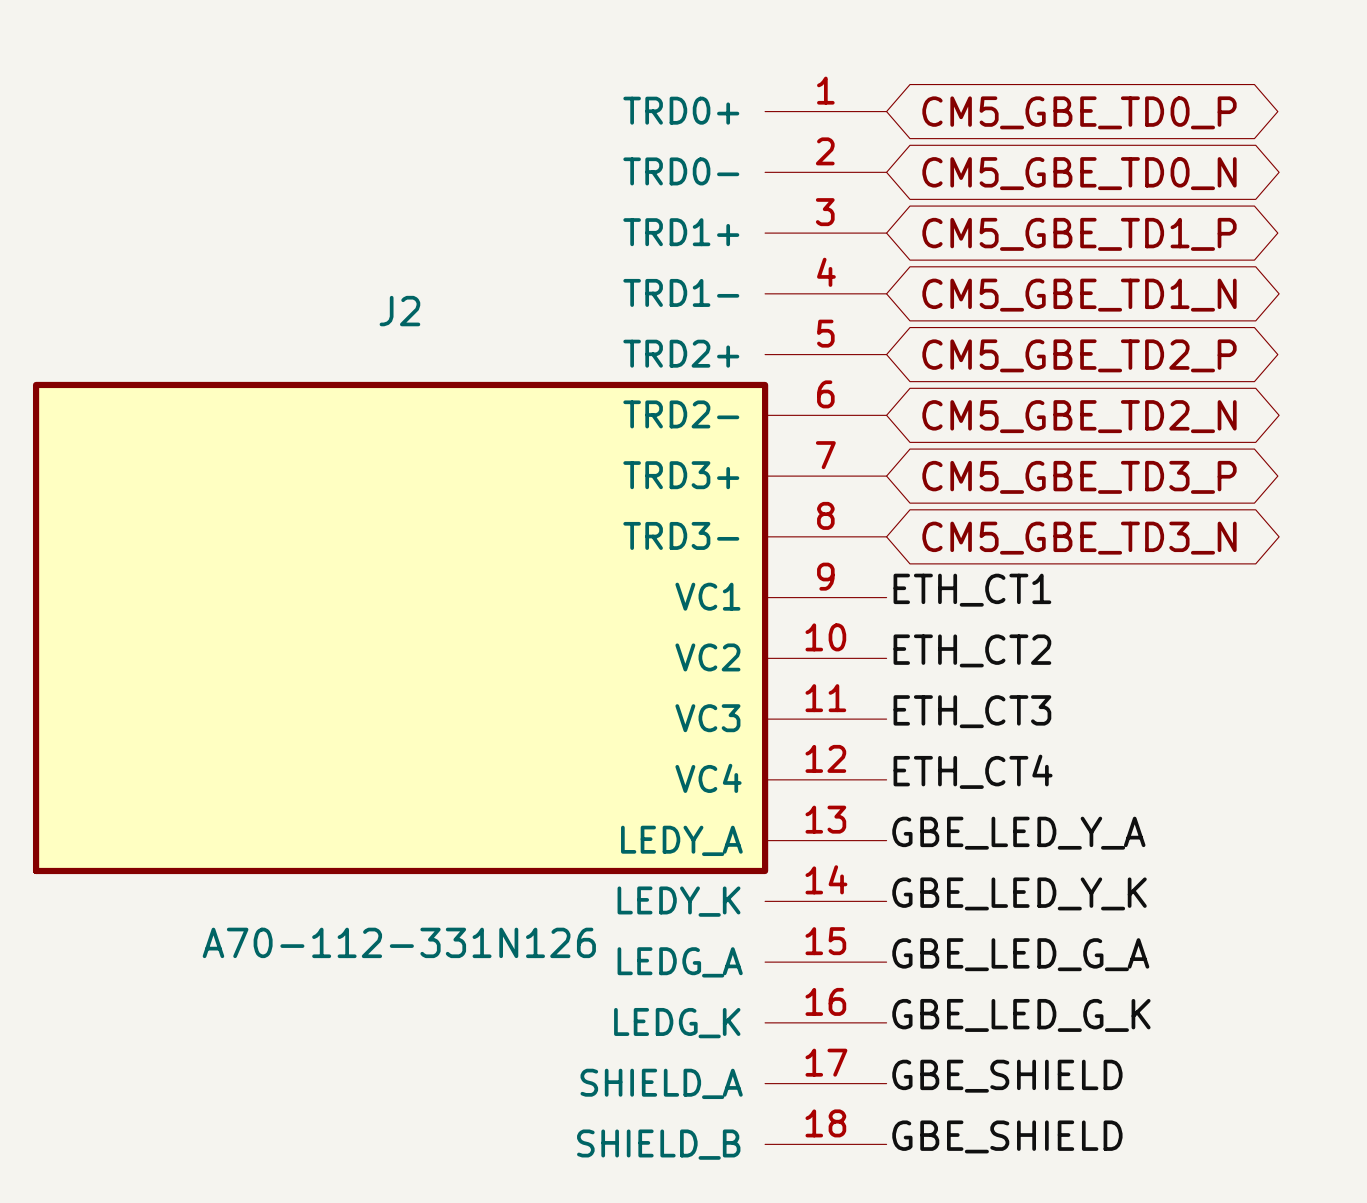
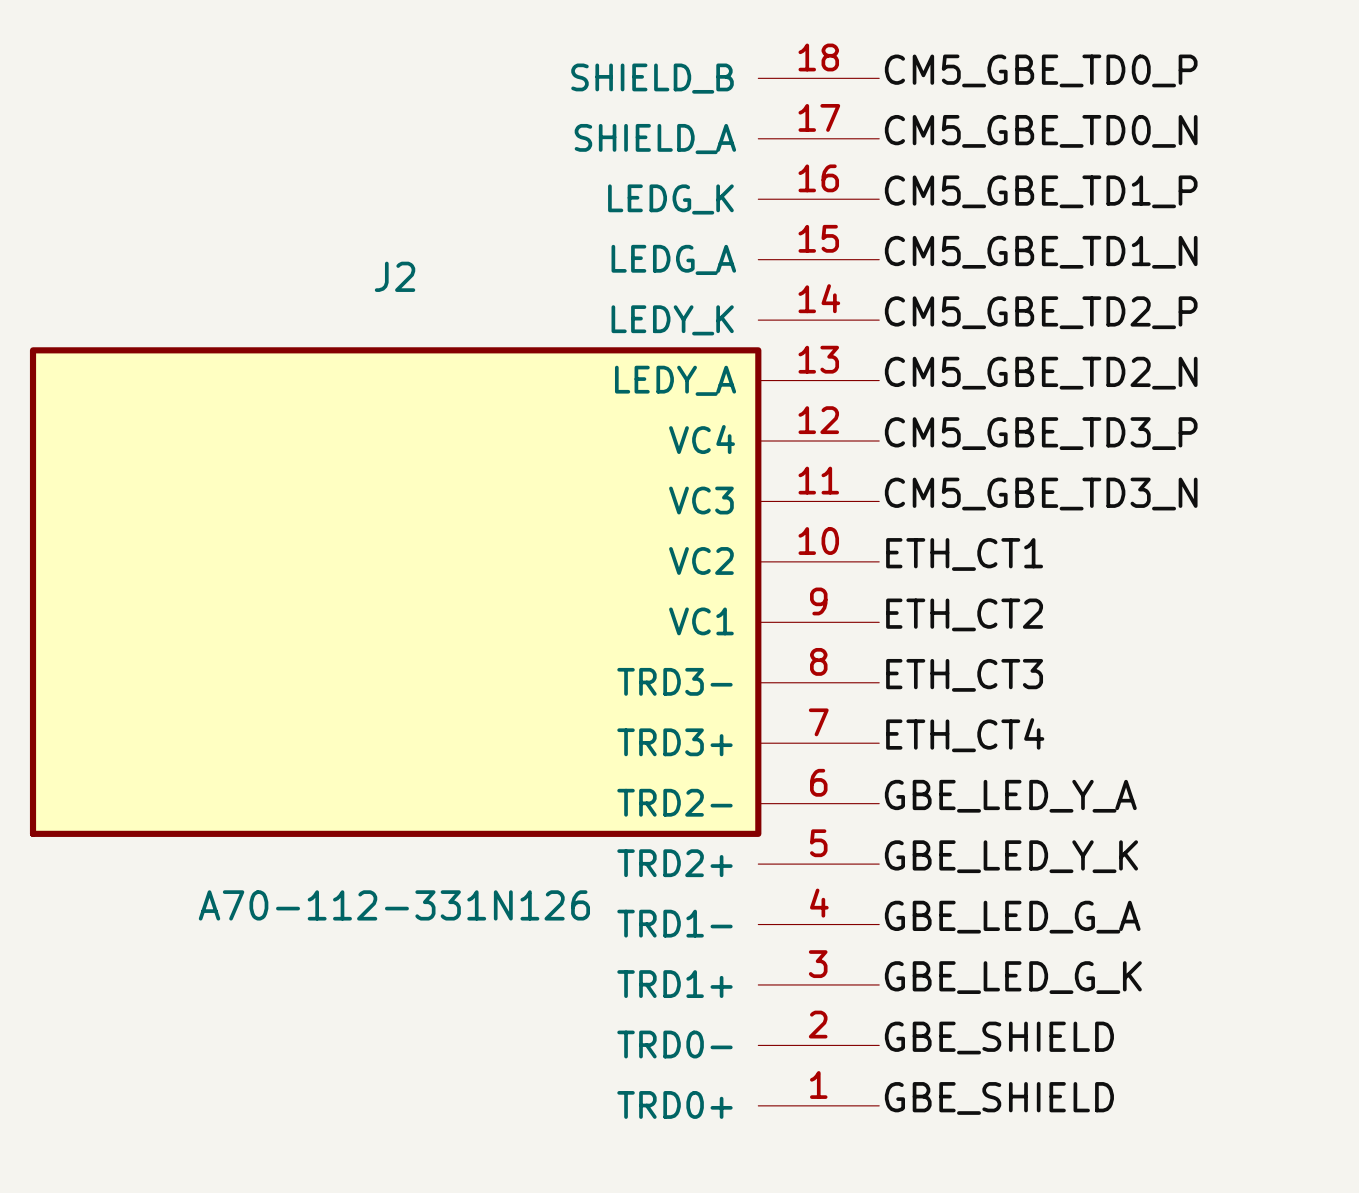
label: none -> CM5_GBE_TD0_P (1041, 70)
global label: CM5_GBE_TD0_P (1079, 112) -> none
label: none -> CM5_GBE_TD0_N (1041, 131)
global label: CM5_GBE_TD0_N (1079, 173) -> none
label: none -> CM5_GBE_TD1_P (1041, 191)
global label: CM5_GBE_TD1_P (1079, 234) -> none
label: none -> CM5_GBE_TD1_N (1041, 252)
global label: CM5_GBE_TD1_N (1079, 295) -> none
label: none -> CM5_GBE_TD2_P (1041, 312)
global label: CM5_GBE_TD2_P (1079, 355) -> none
label: none -> CM5_GBE_TD2_N (1041, 373)
global label: CM5_GBE_TD2_N (1079, 416) -> none
label: none -> CM5_GBE_TD3_P (1041, 433)
global label: CM5_GBE_TD3_P (1079, 477) -> none
label: none -> CM5_GBE_TD3_N (1041, 494)
global label: CM5_GBE_TD3_N (1079, 538) -> none
J2 flip: as is (400, 627) -> up-down (395, 592)

